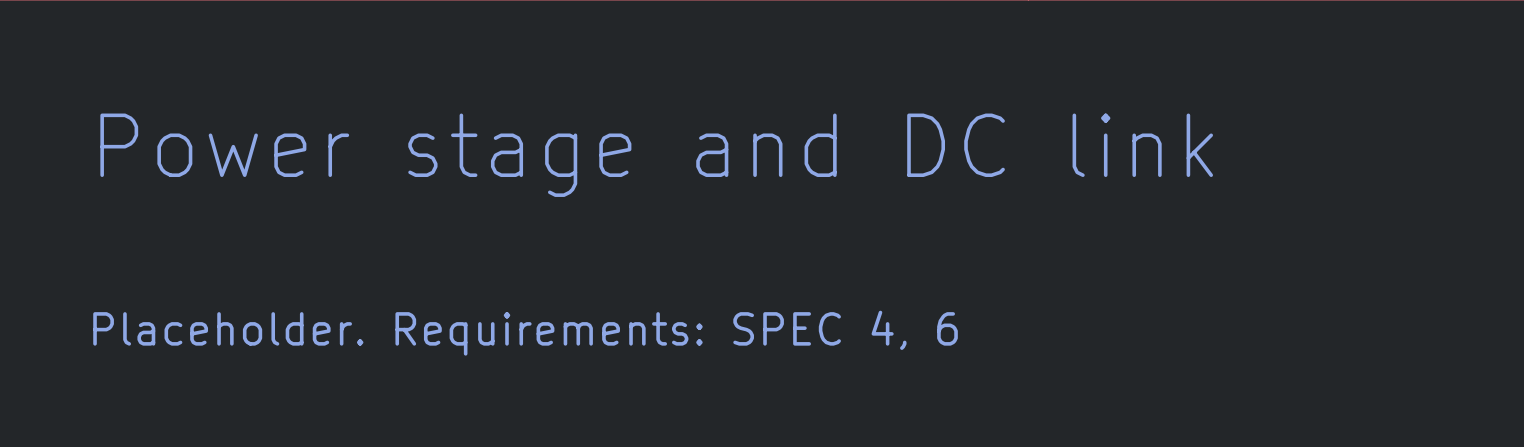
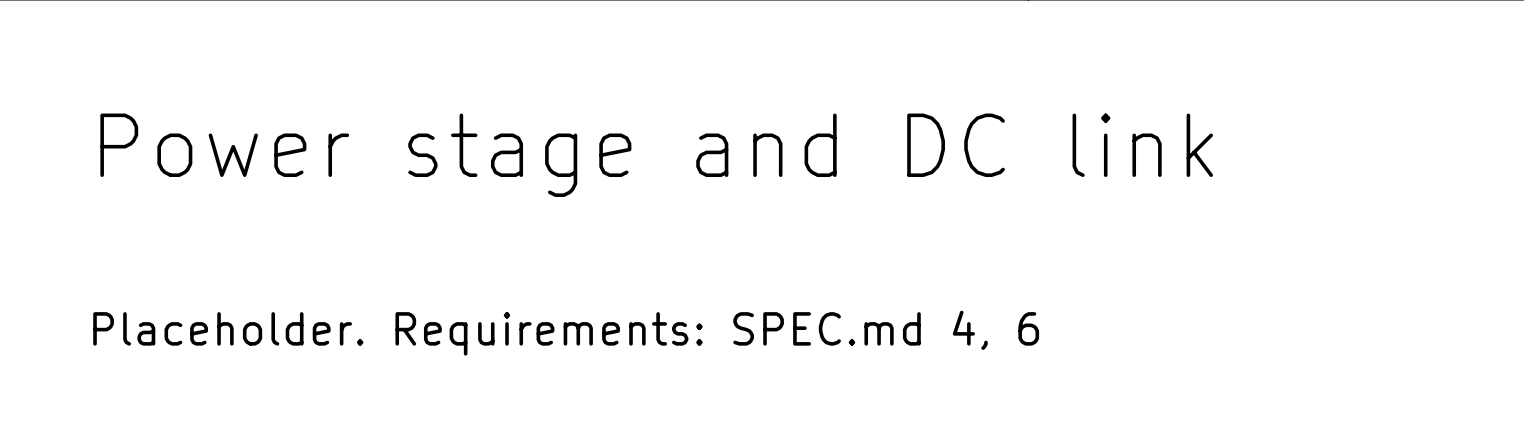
text: Placeholder. Requirements: SPEC 4, 6 (525, 333) -> Placeholder. Requirements: SPEC.md 4, 6 (566, 333)

